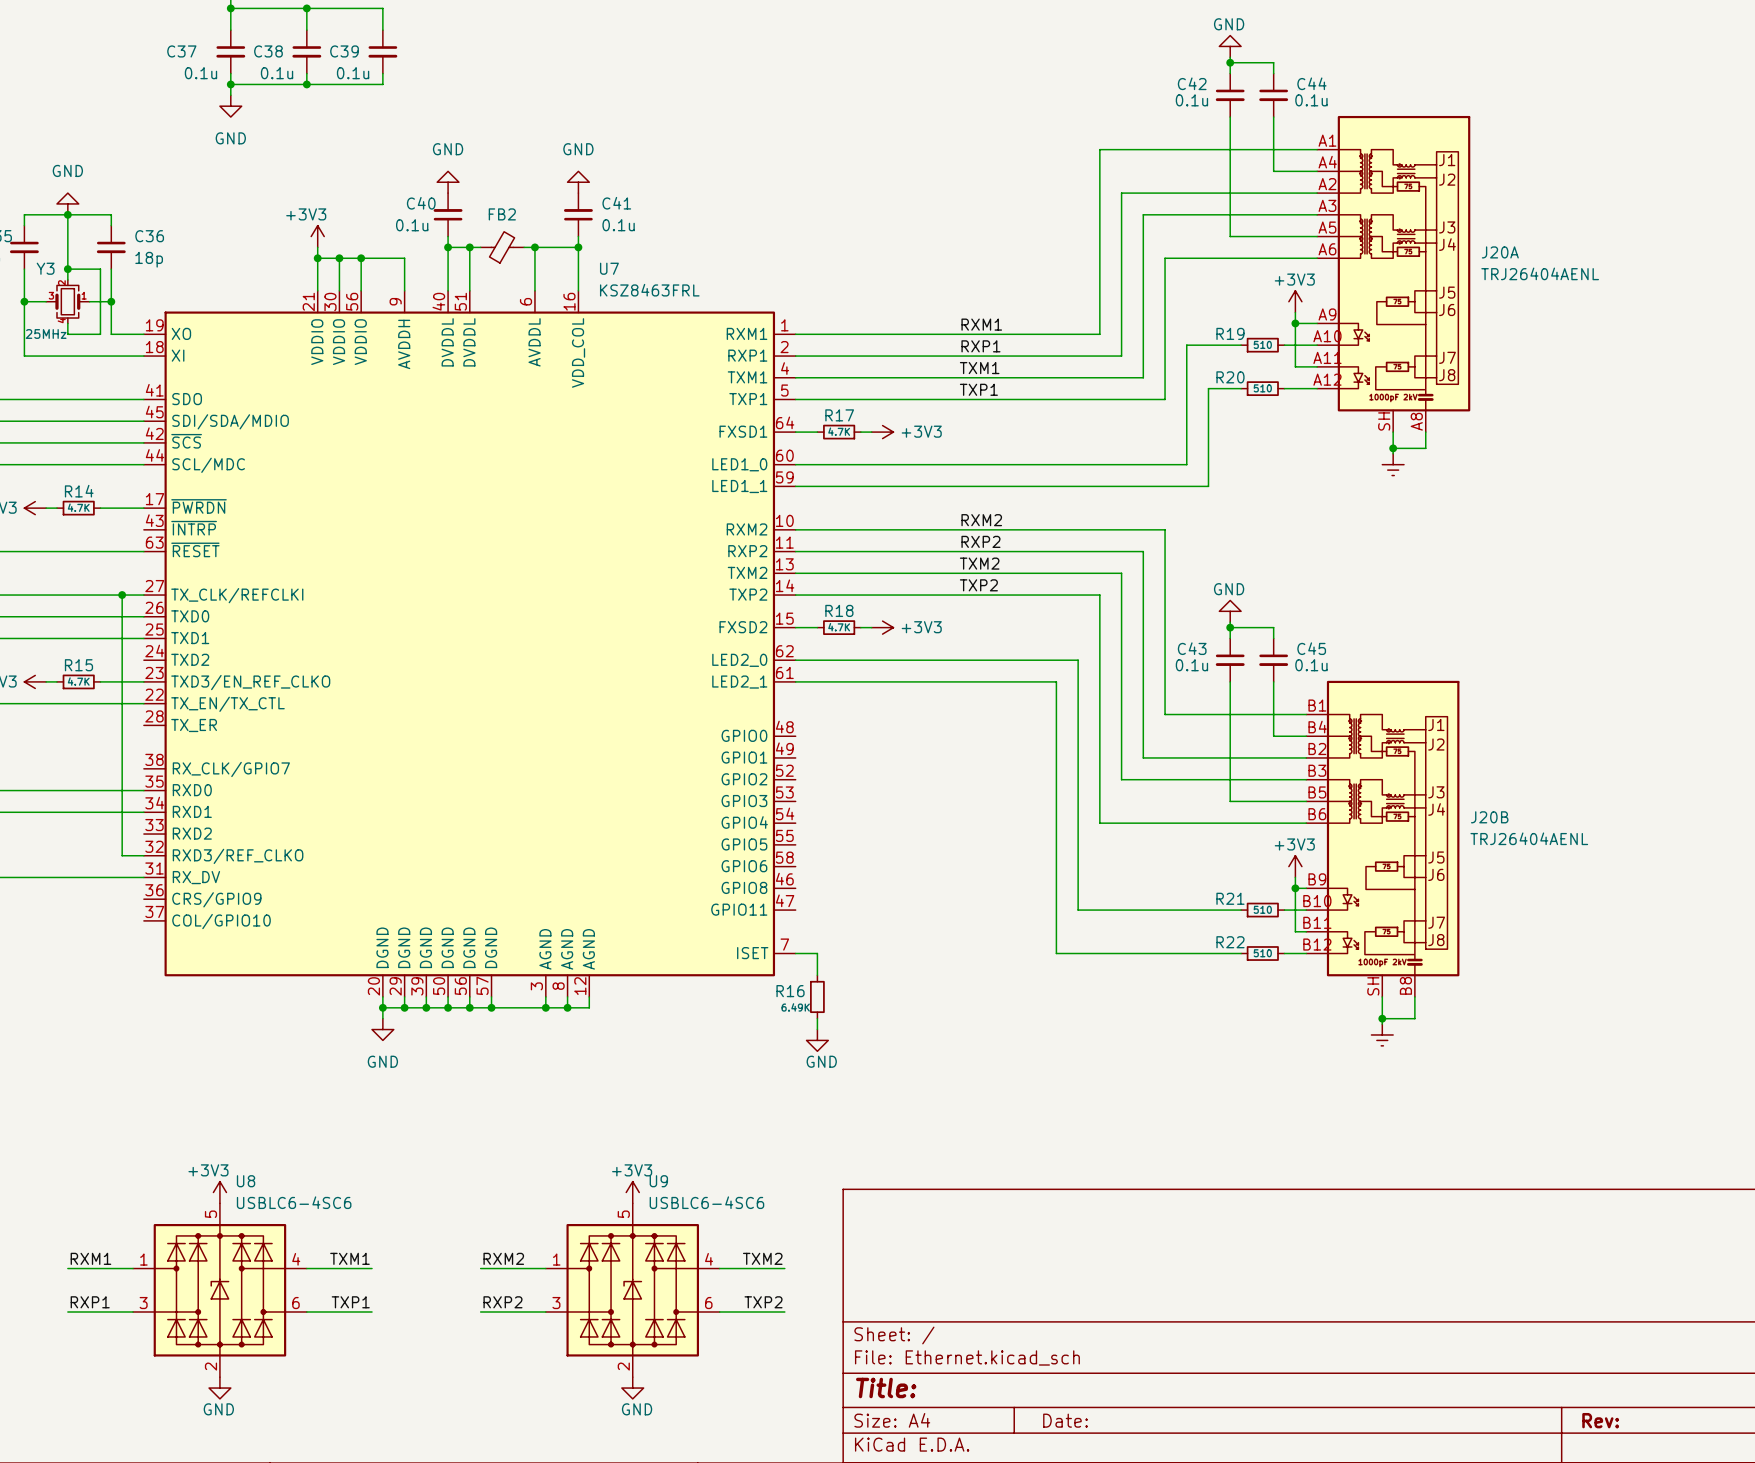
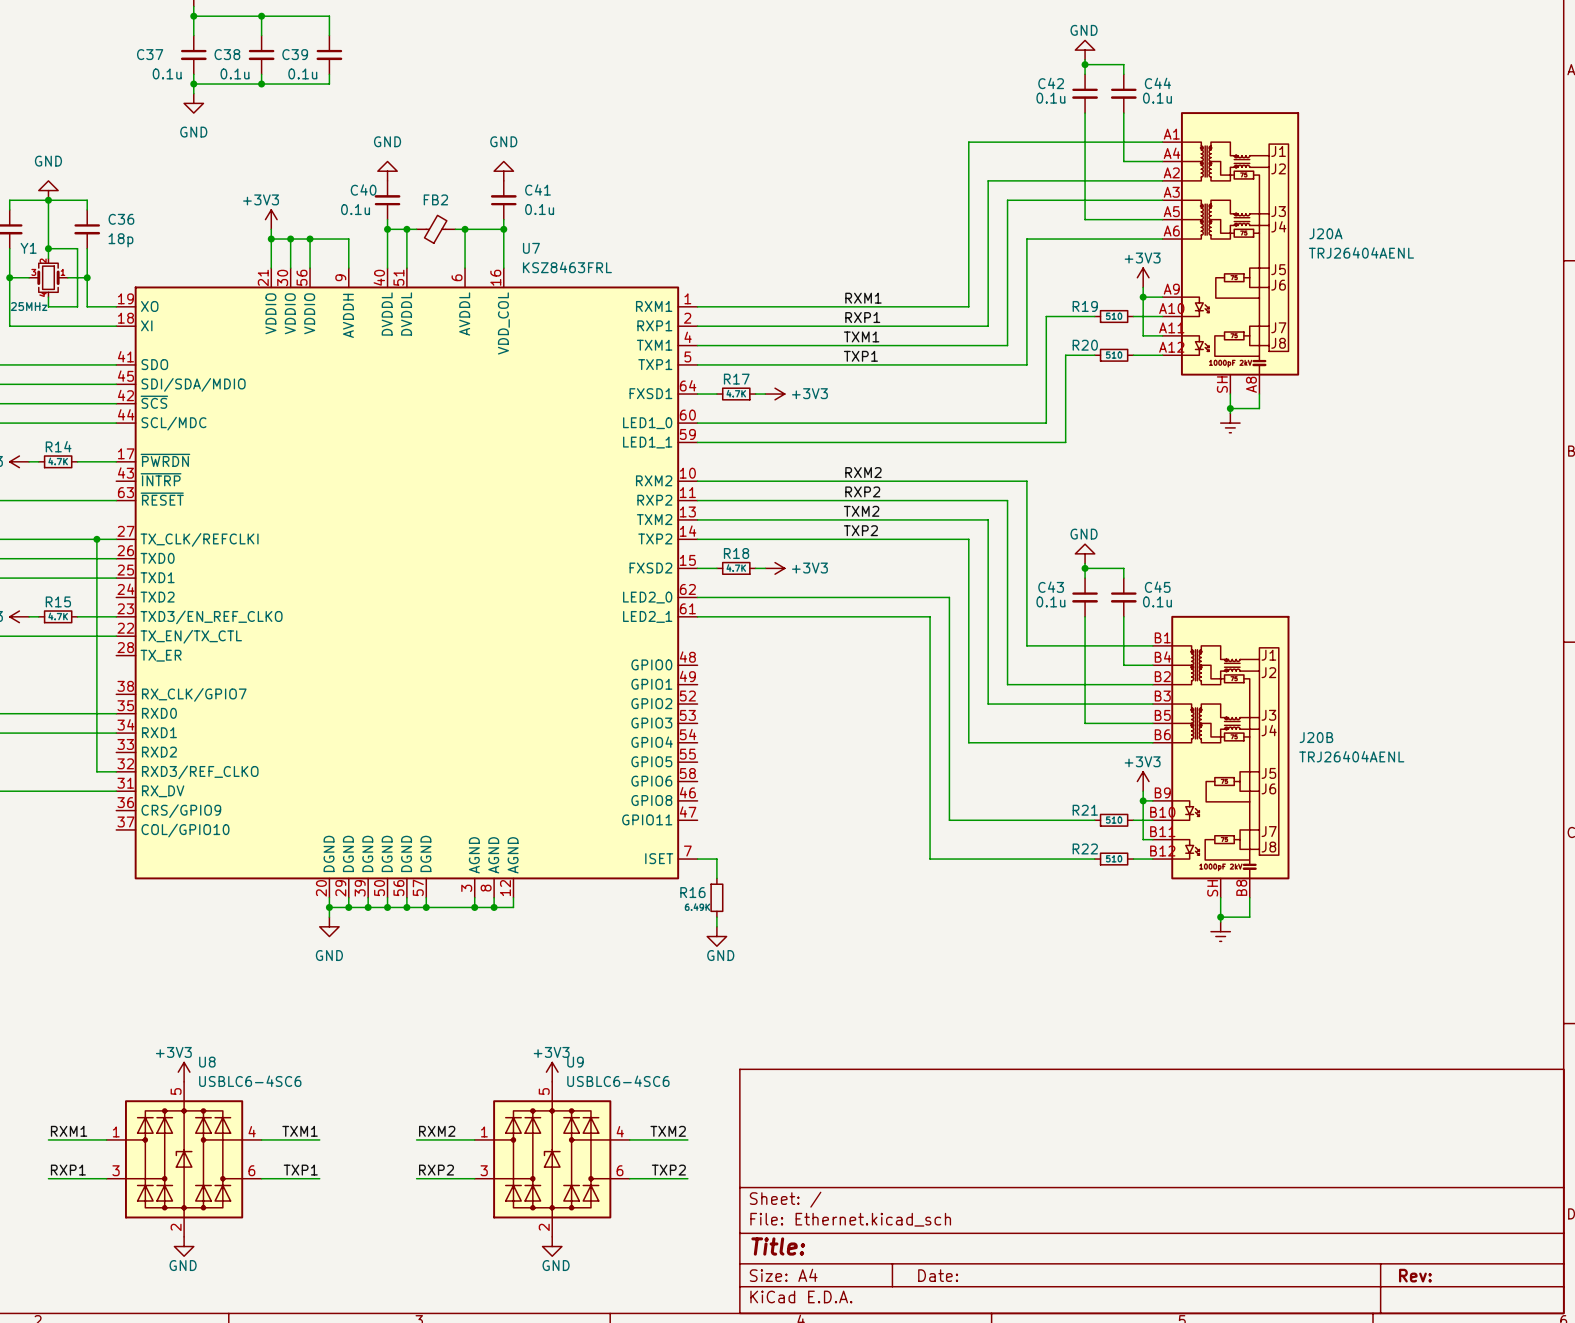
Y3 name: Y3 (45, 268) -> Y1 (28, 248)

